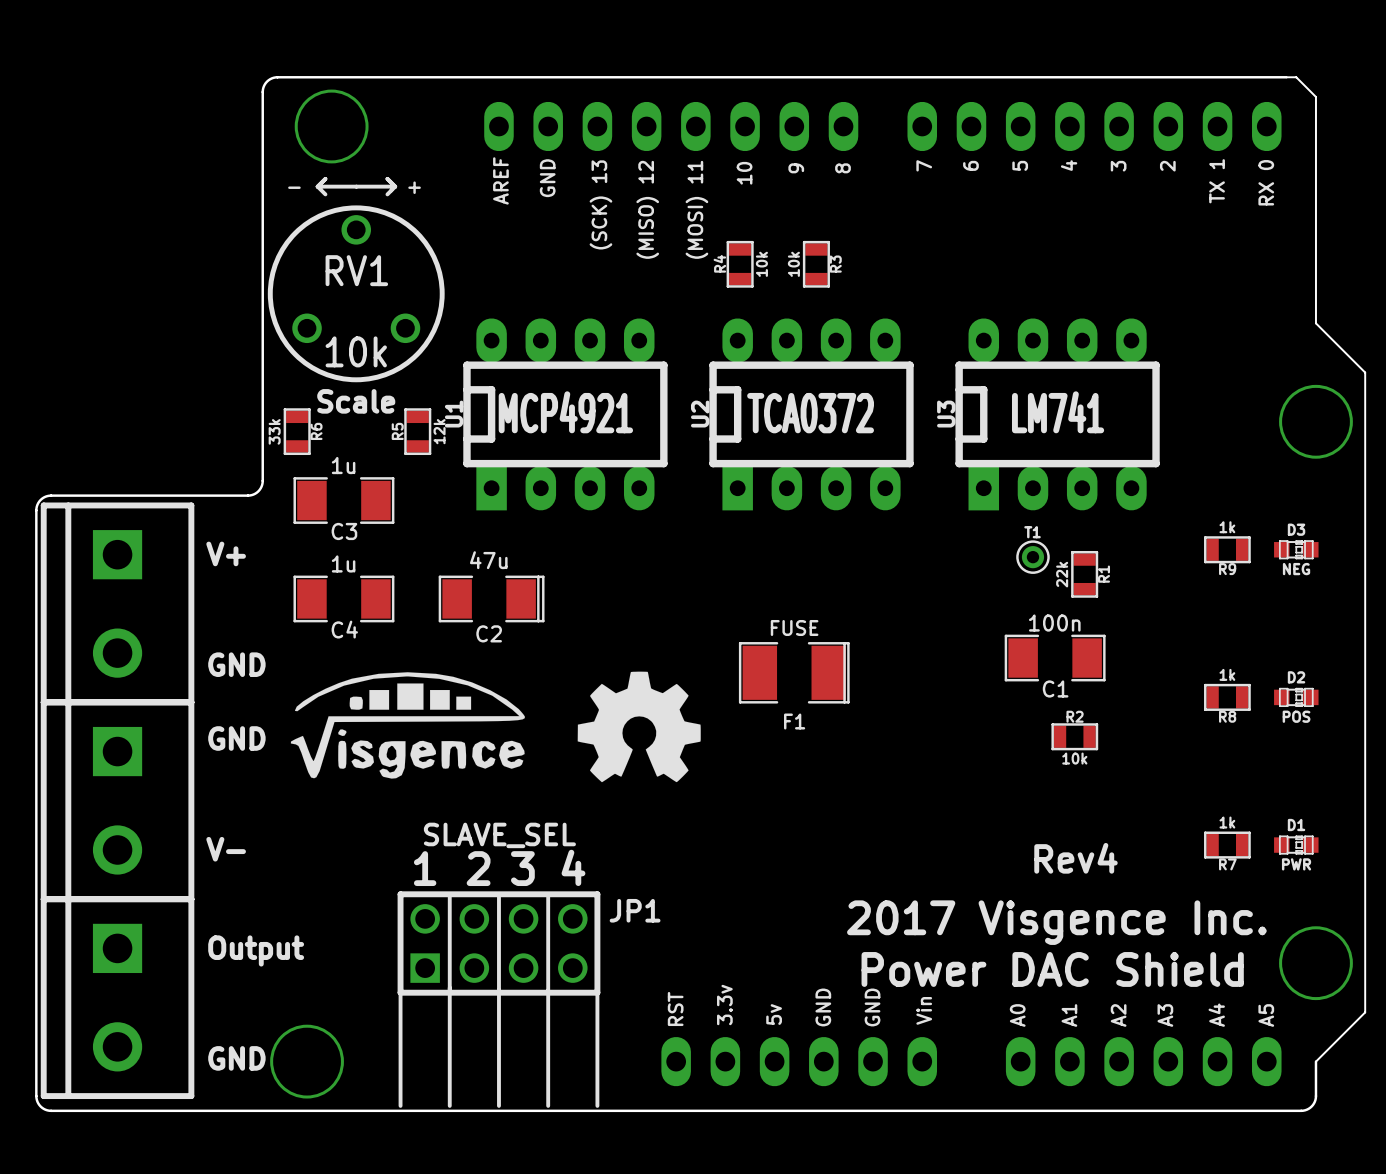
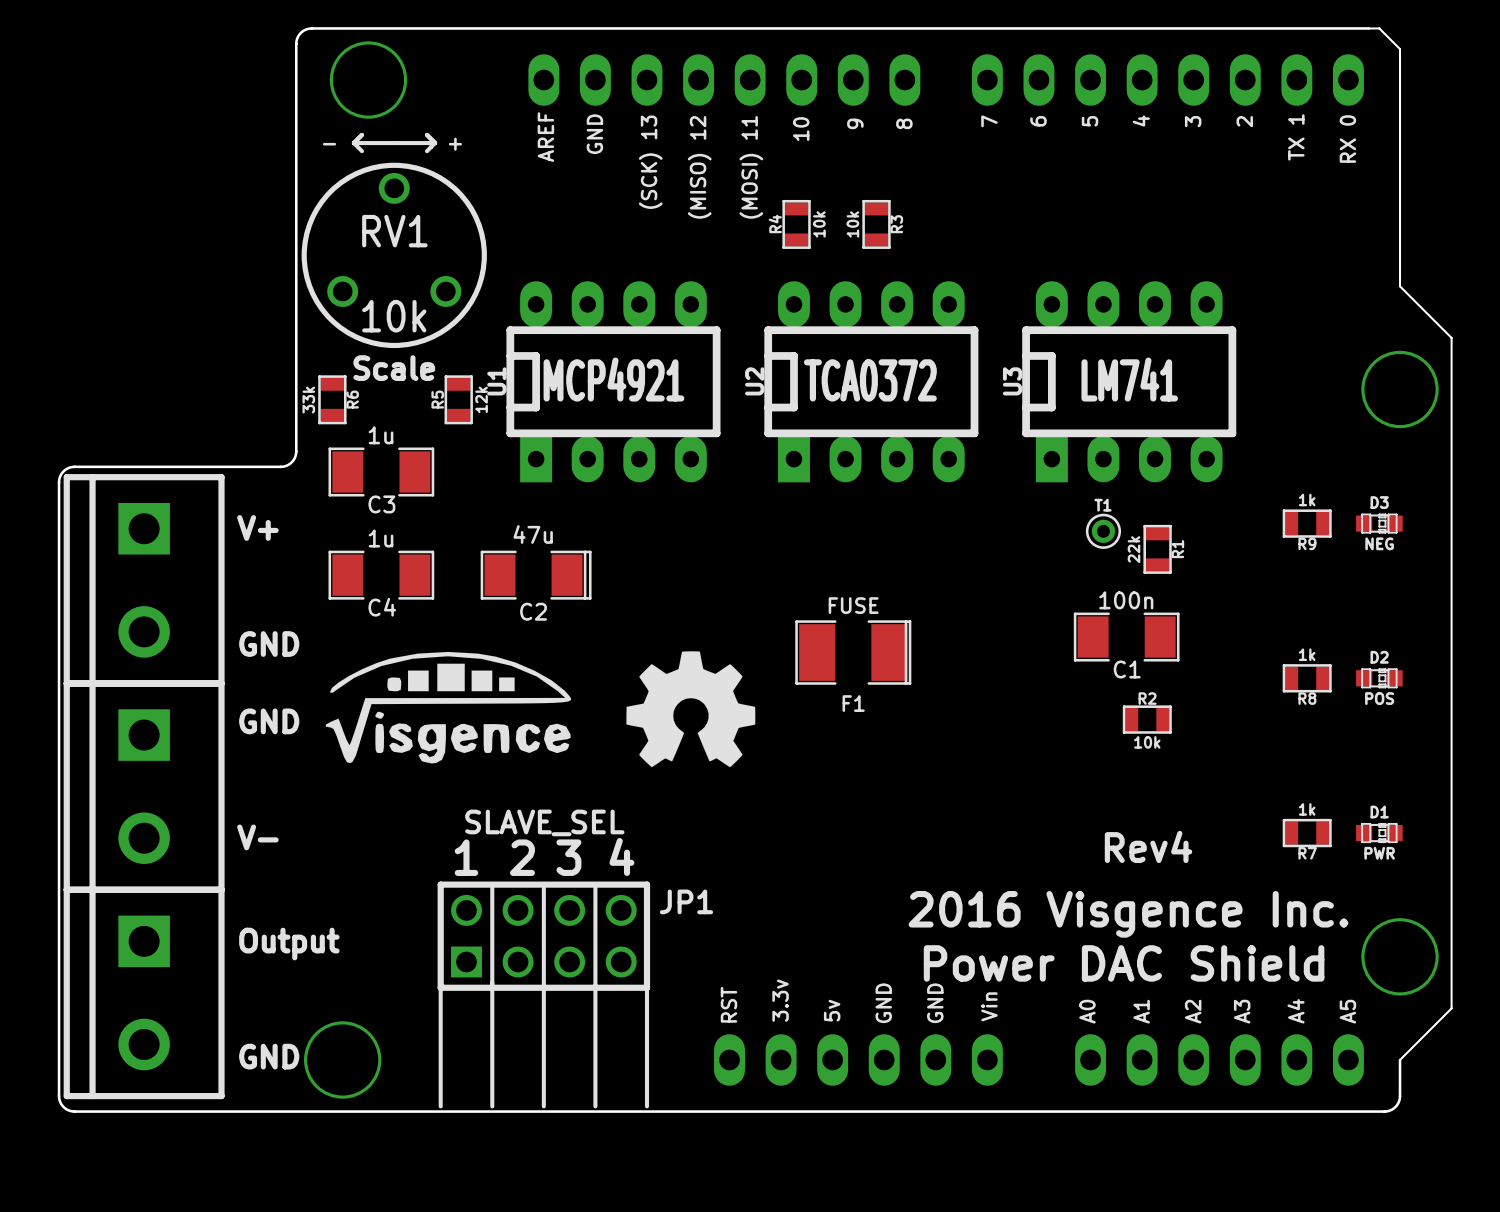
text: 2017 Visgence Inc. (1056, 922) -> 2016 Visgence Inc. (1128, 914)

